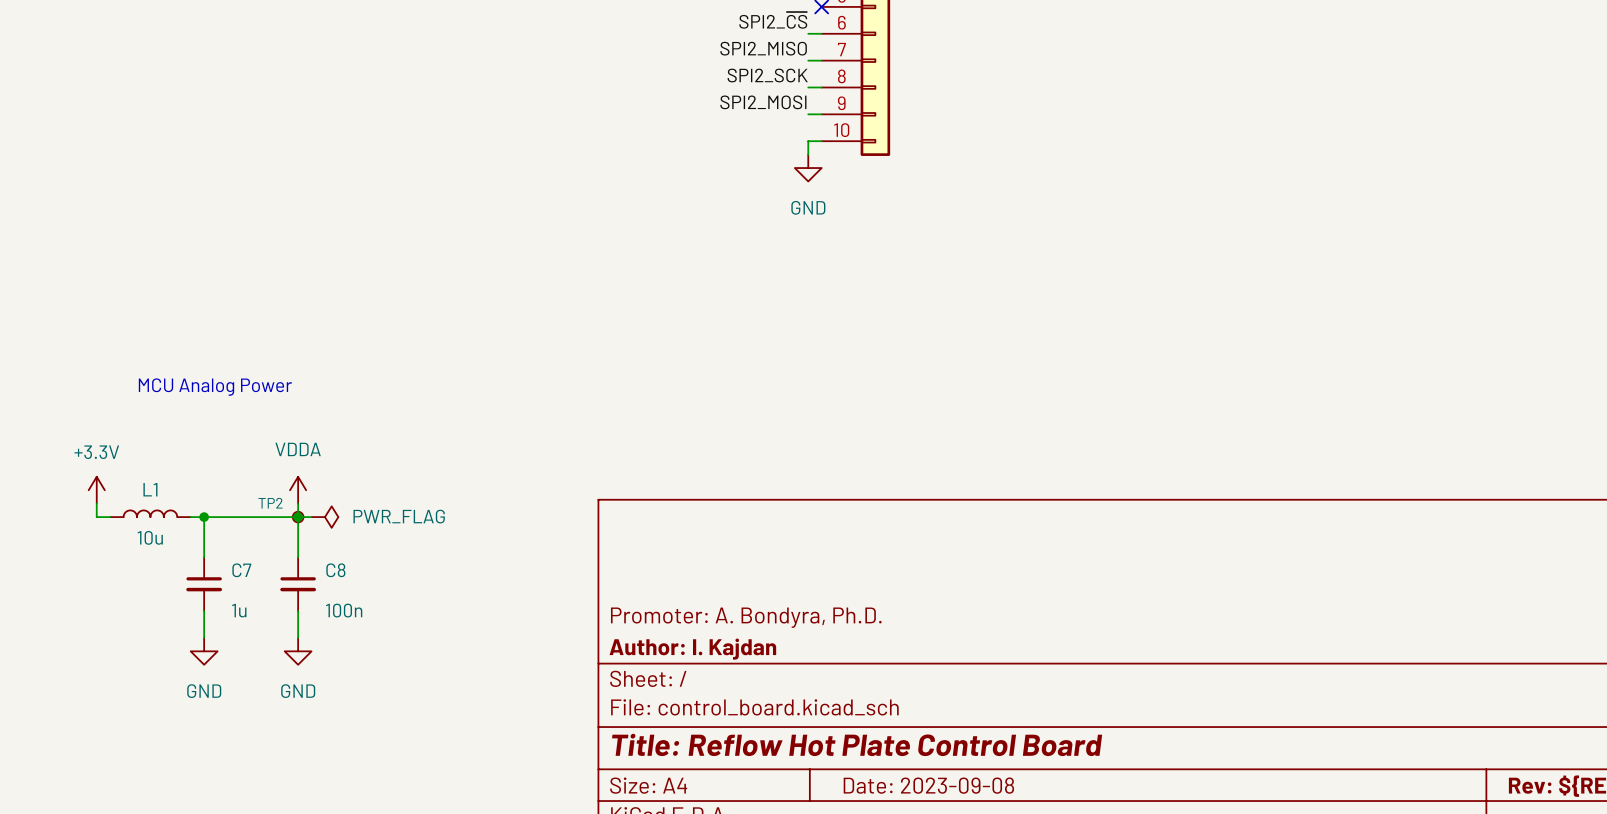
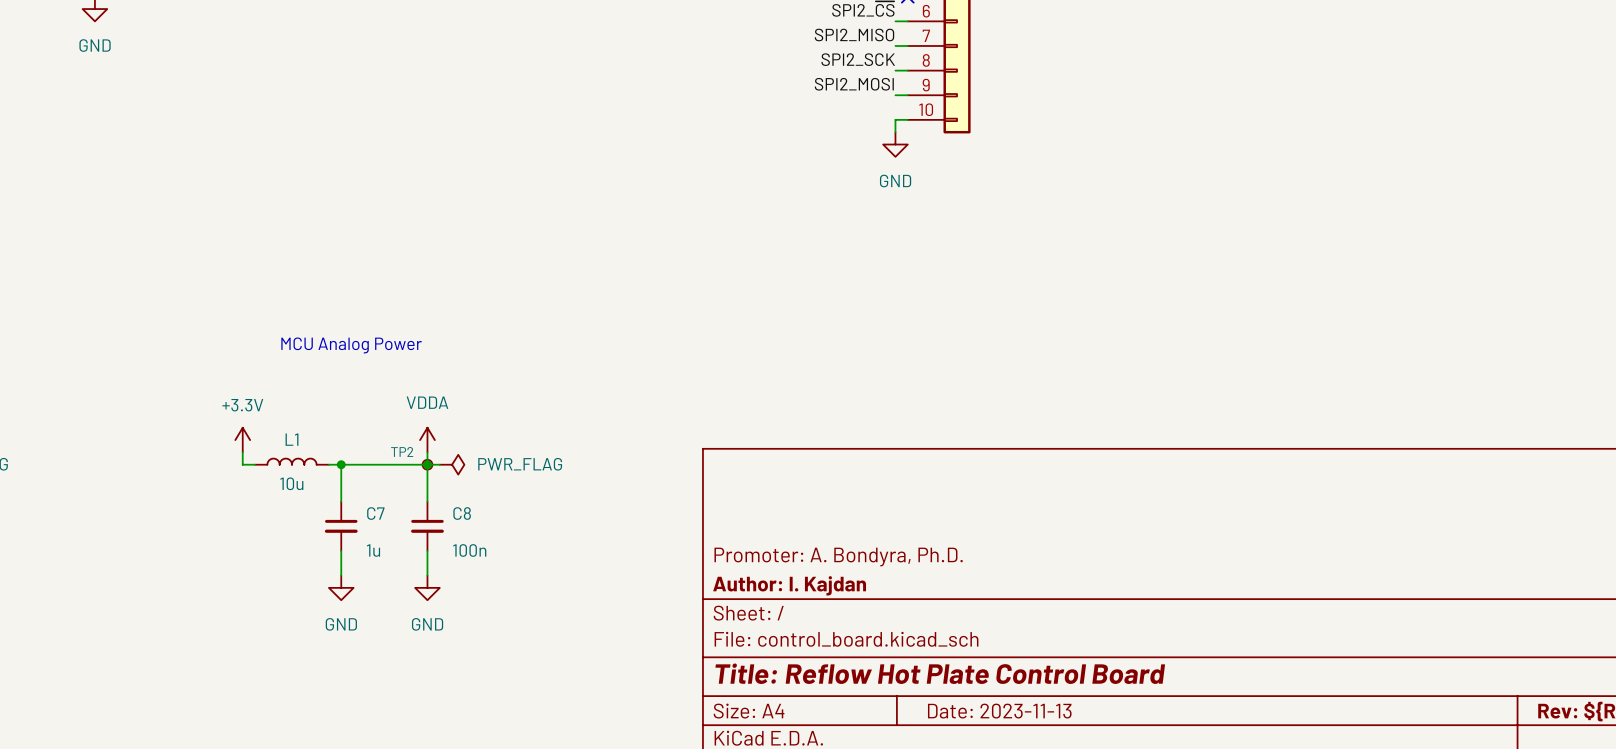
title block: Date: 2023-09-08 (928, 785) -> Date: 2023-11-13 (999, 711)

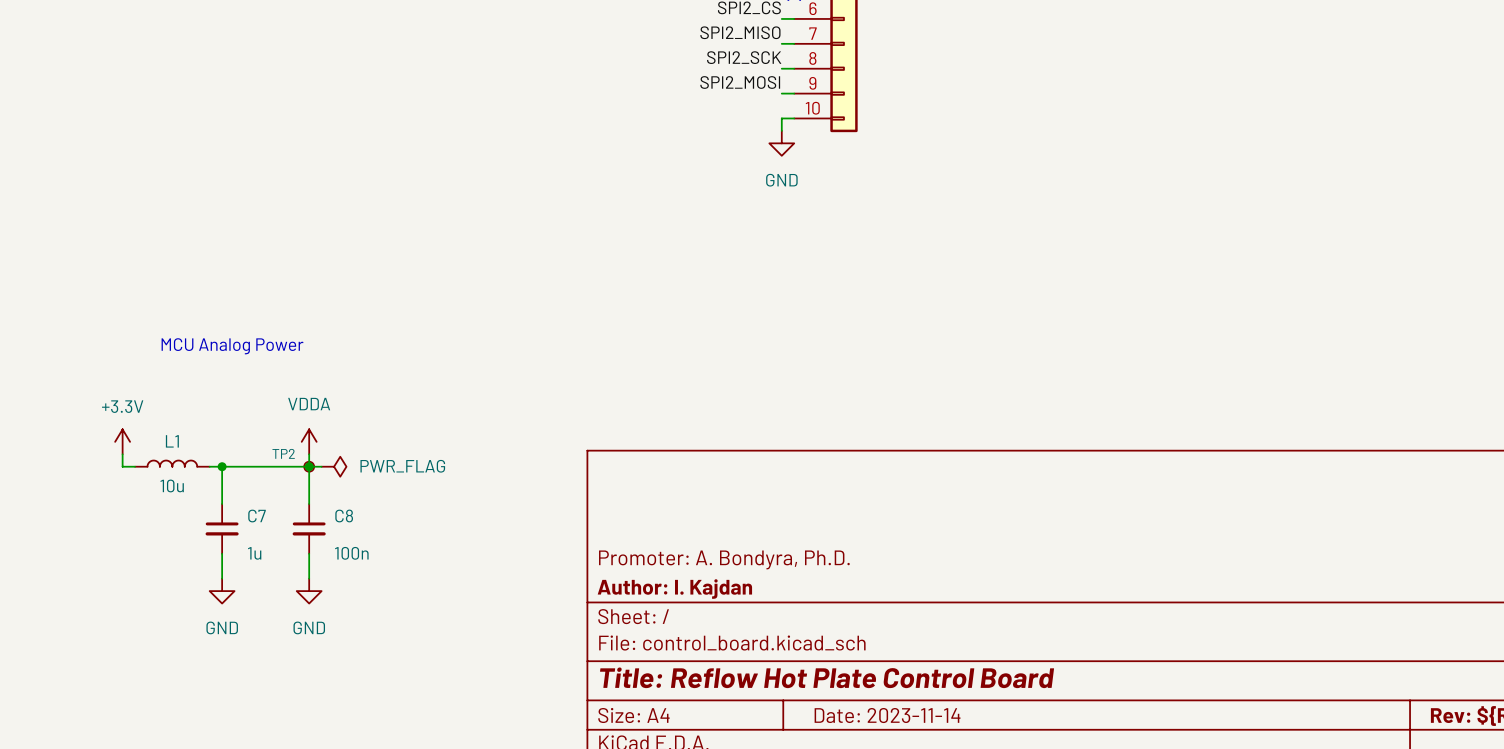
title block: Date: 2023-11-13 (999, 711) -> Date: 2023-11-14 (887, 715)

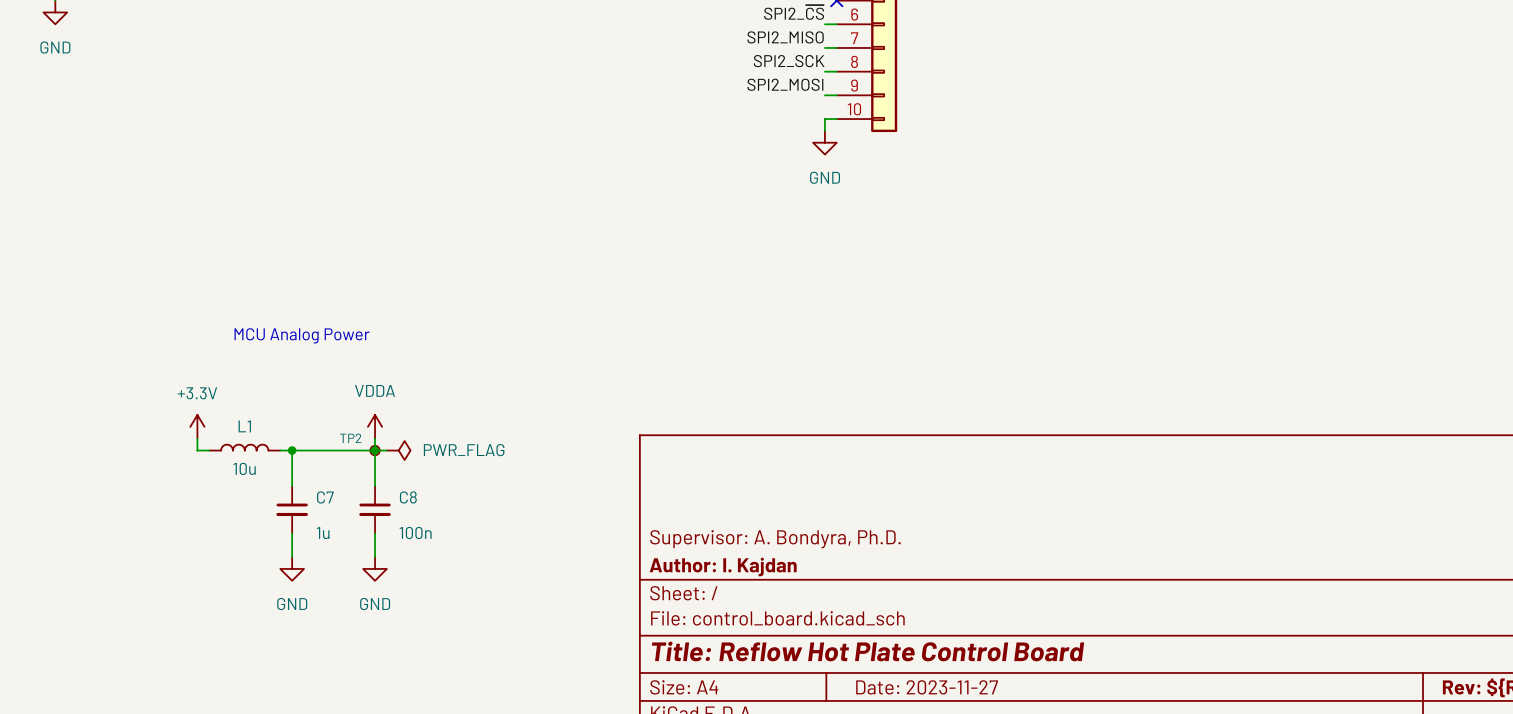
title block: Promoter: A. Bondyra, Ph.D. (724, 559) -> Supervisor: A. Bondyra, Ph.D. (775, 539)
title block: Date: 2023-11-14 (887, 715) -> Date: 2023-11-27 (927, 687)

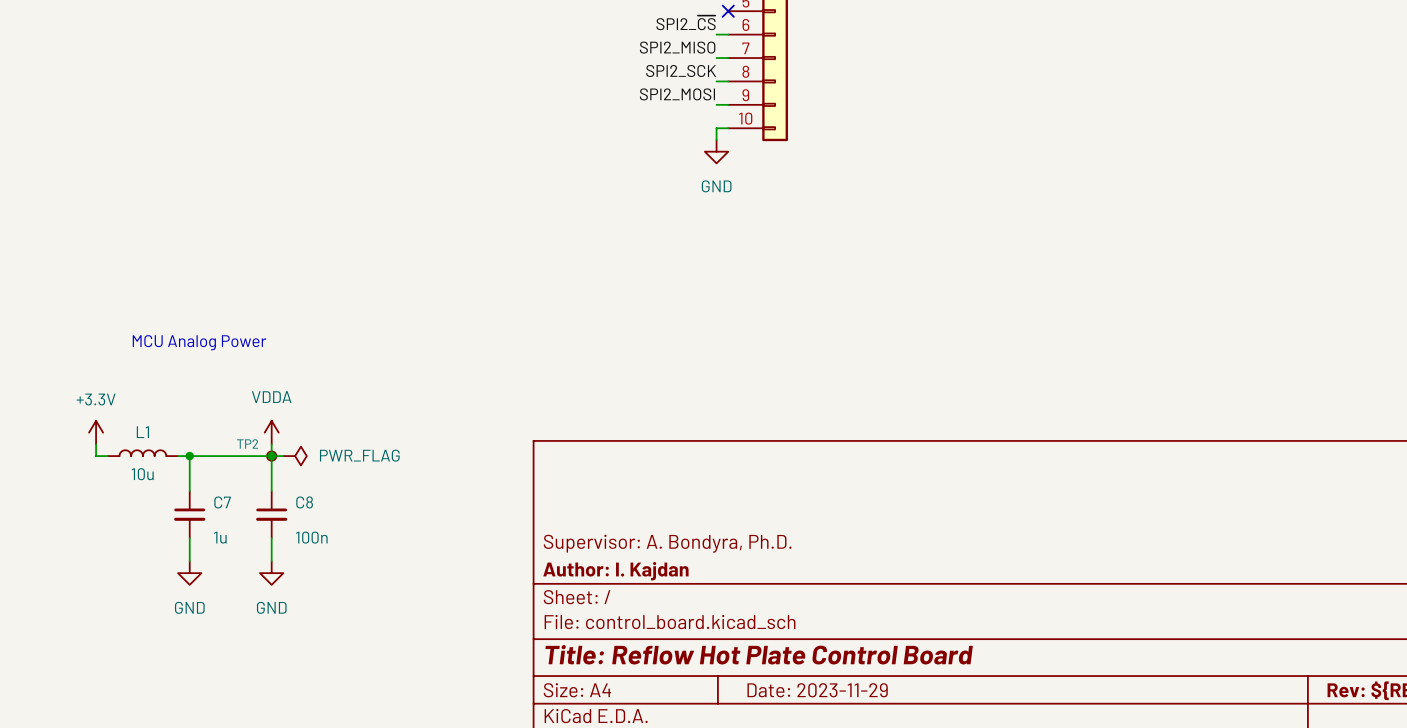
title block: Date: 2023-11-27 (927, 687) -> Date: 2023-11-29 (817, 690)

